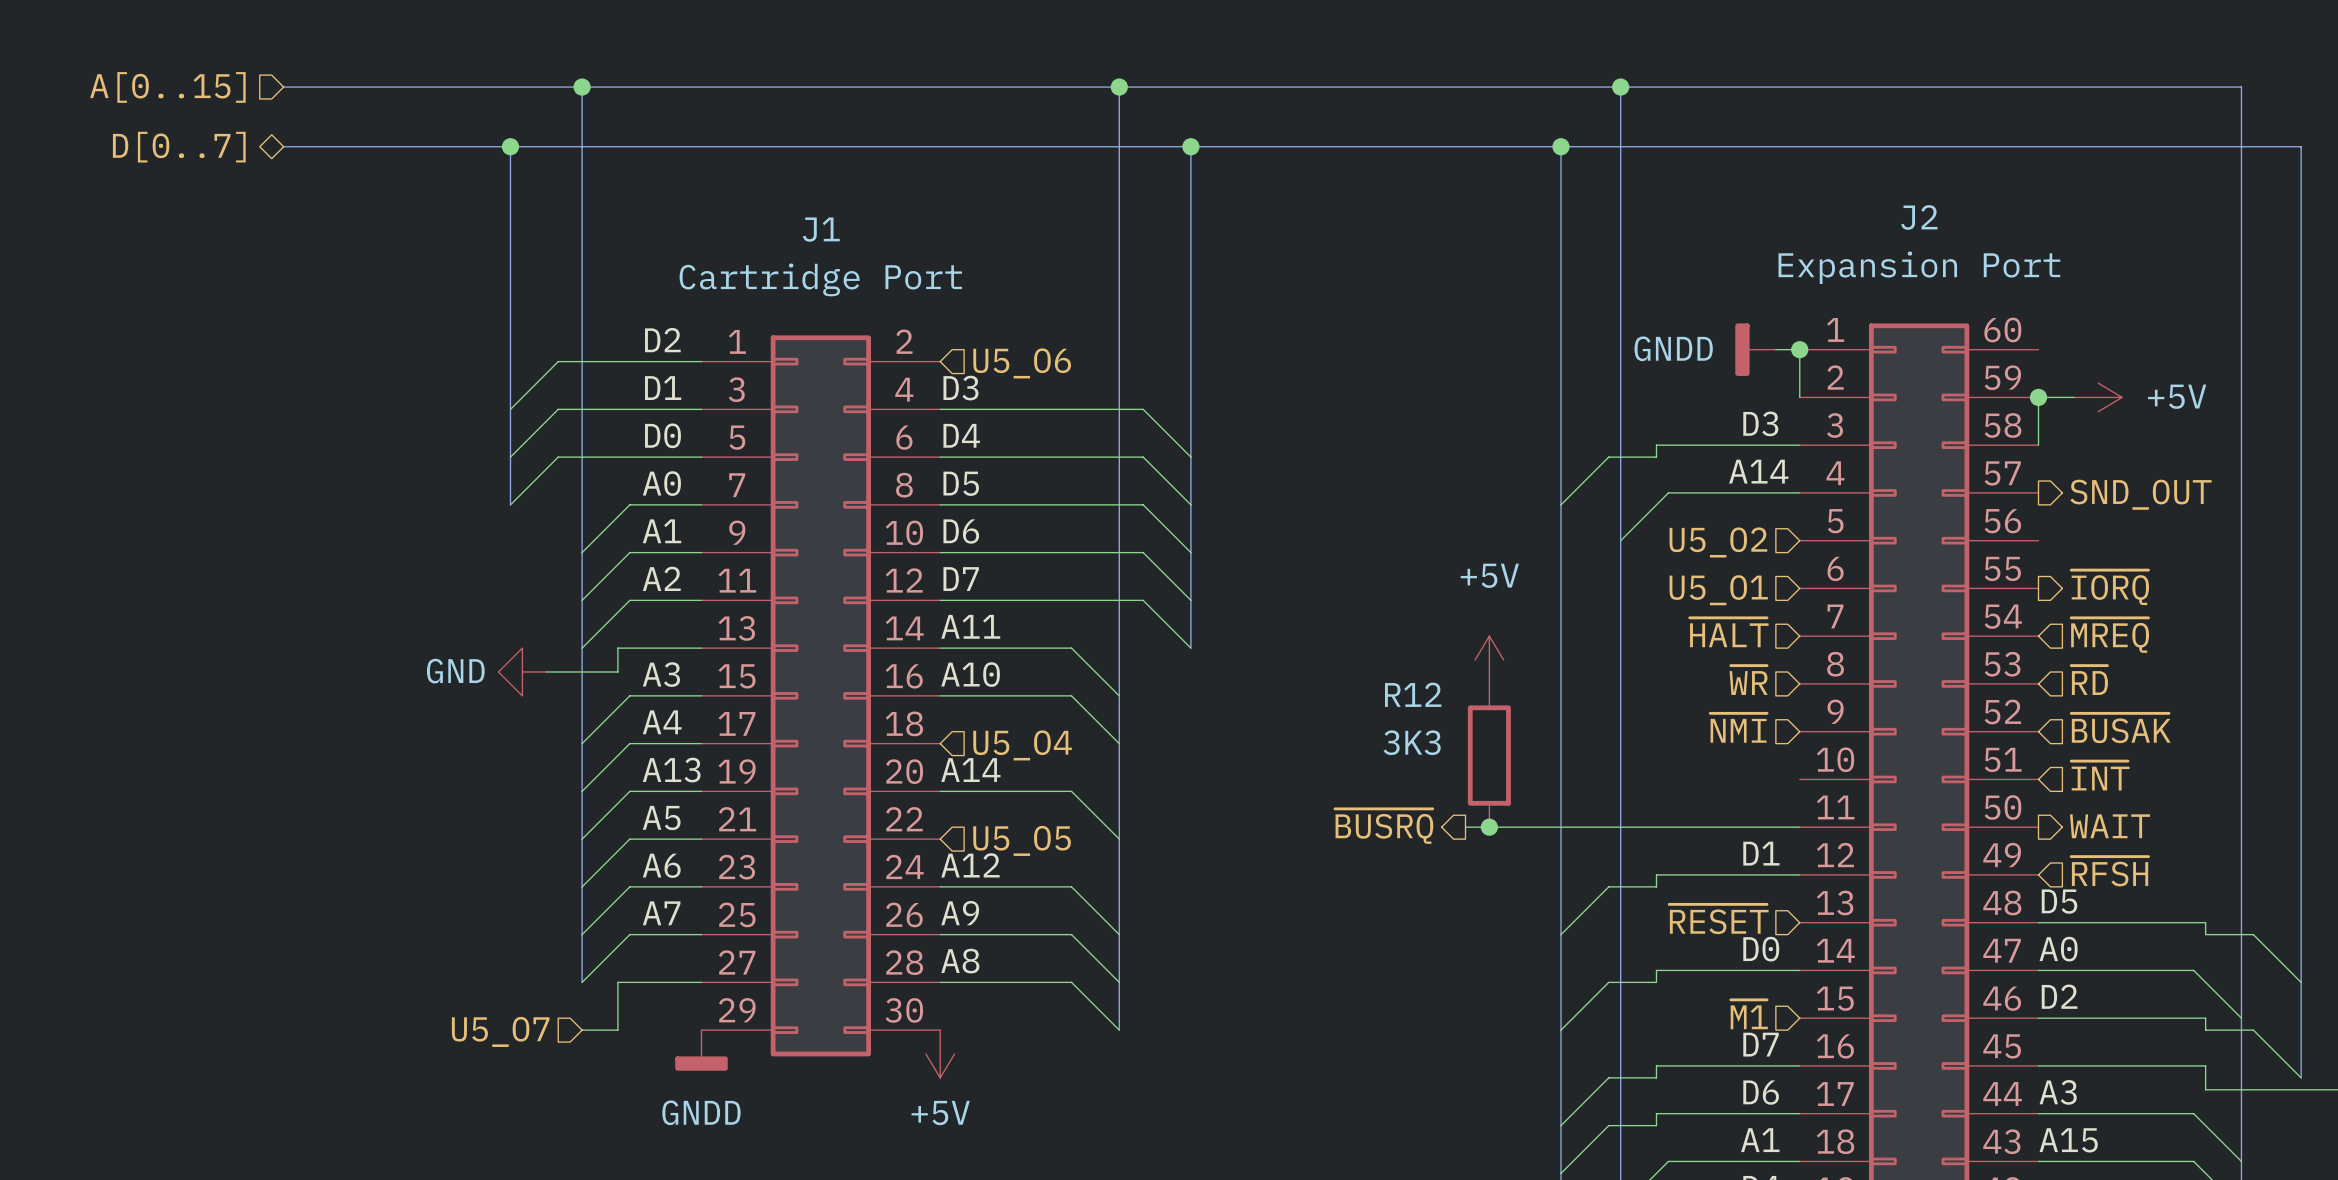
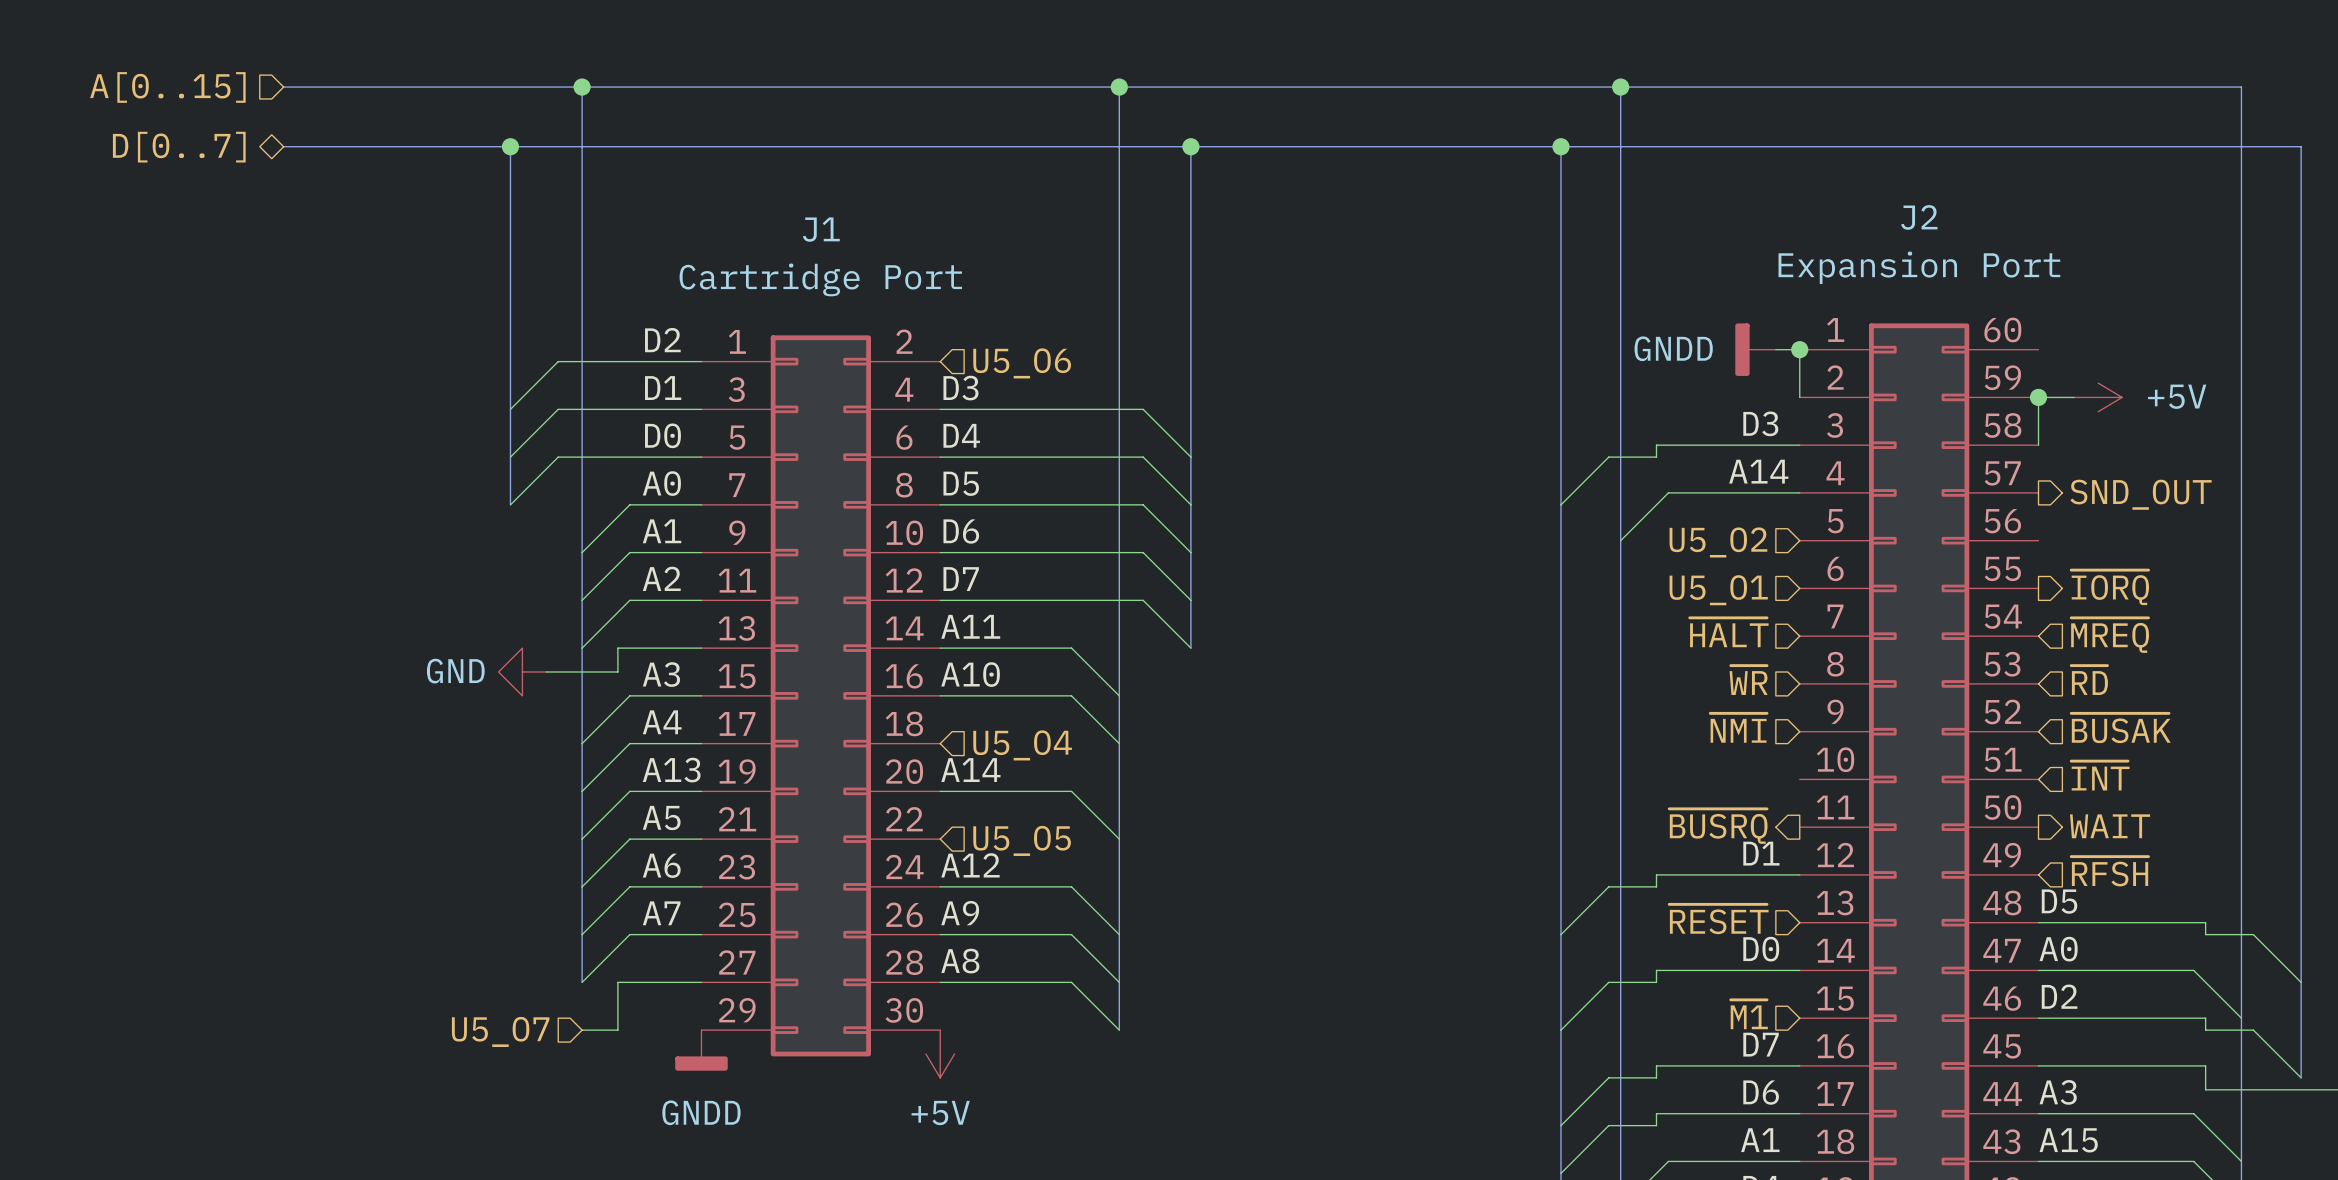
power symbol: +5V (1489, 660) -> none
R12: 3K3 (1489, 755) -> none
hierarchical label position: ~{BUSRQ} (1384, 826) -> ~{BUSRQ} (1718, 826)
wire: (1465, 827) (1799, 827) -> none
junction: (1489, 827) -> none

